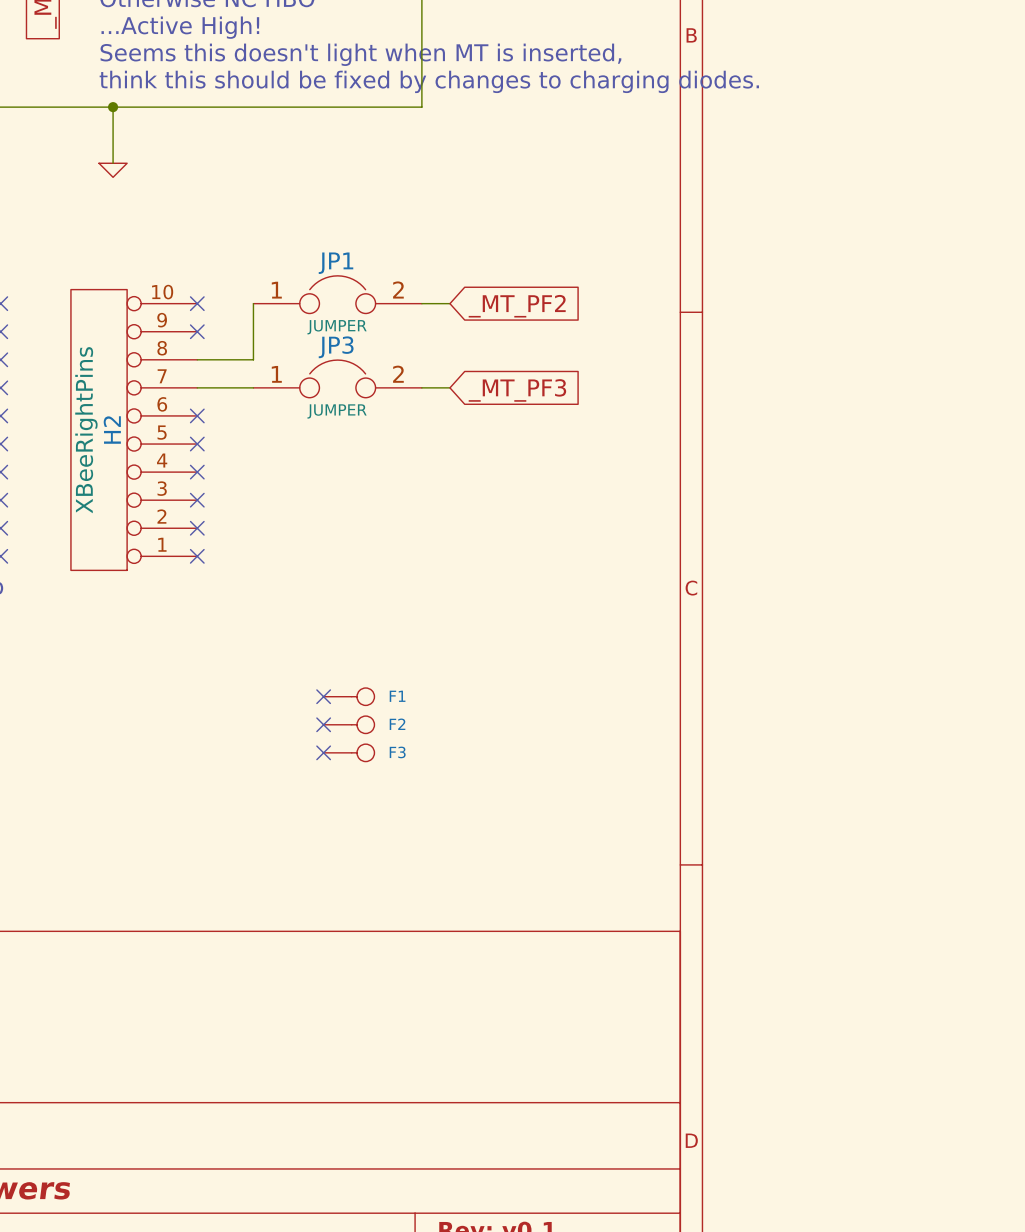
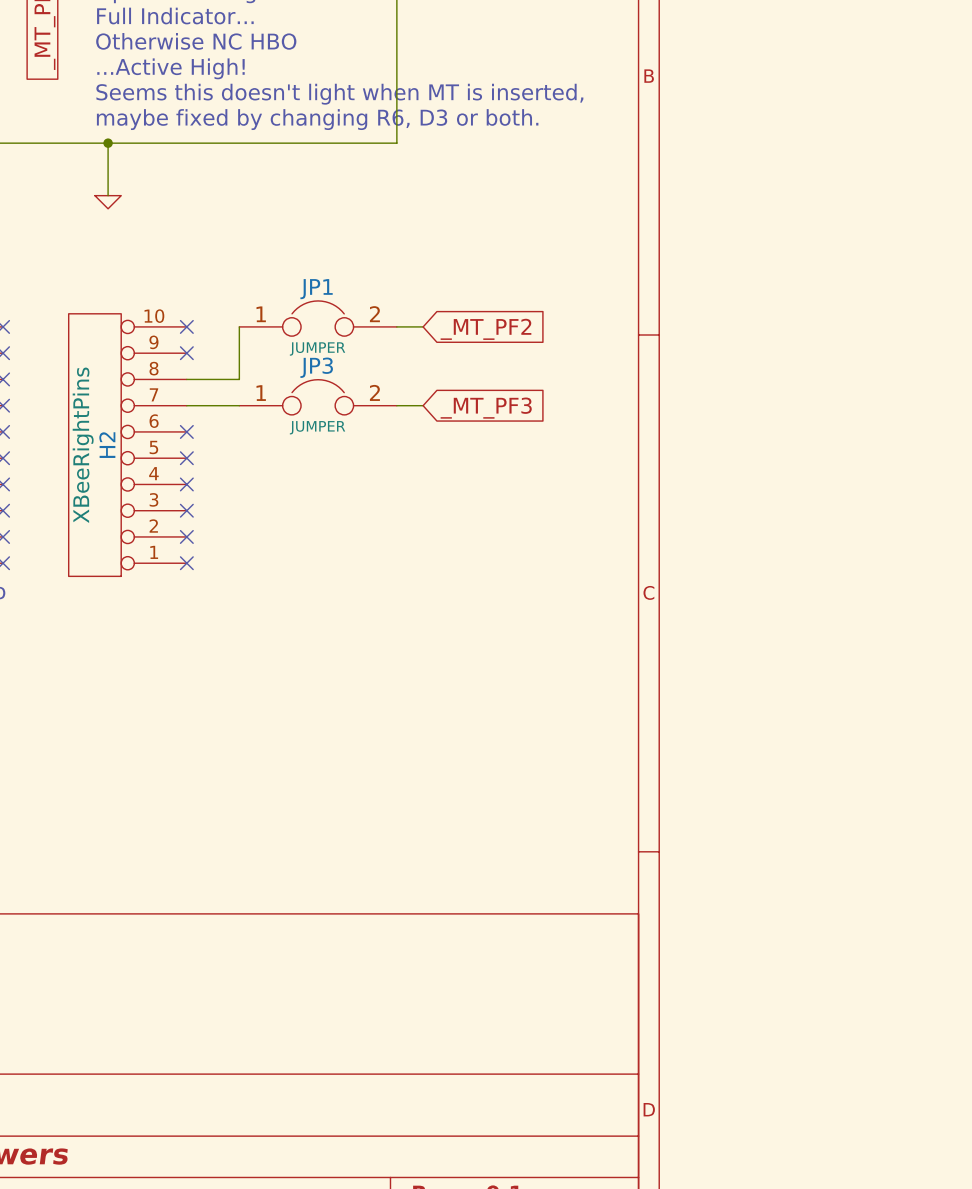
text: think this should be fixed by changes to charging diodes. (429, 81) -> maybe fixed by changing R6, D3 or both. (317, 119)
no-connect mark: (323, 696) -> none
F1: (349, 696) -> none
no-connect mark: (323, 724) -> none
F2: (349, 724) -> none
no-connect mark: (323, 752) -> none
F3: (349, 752) -> none

